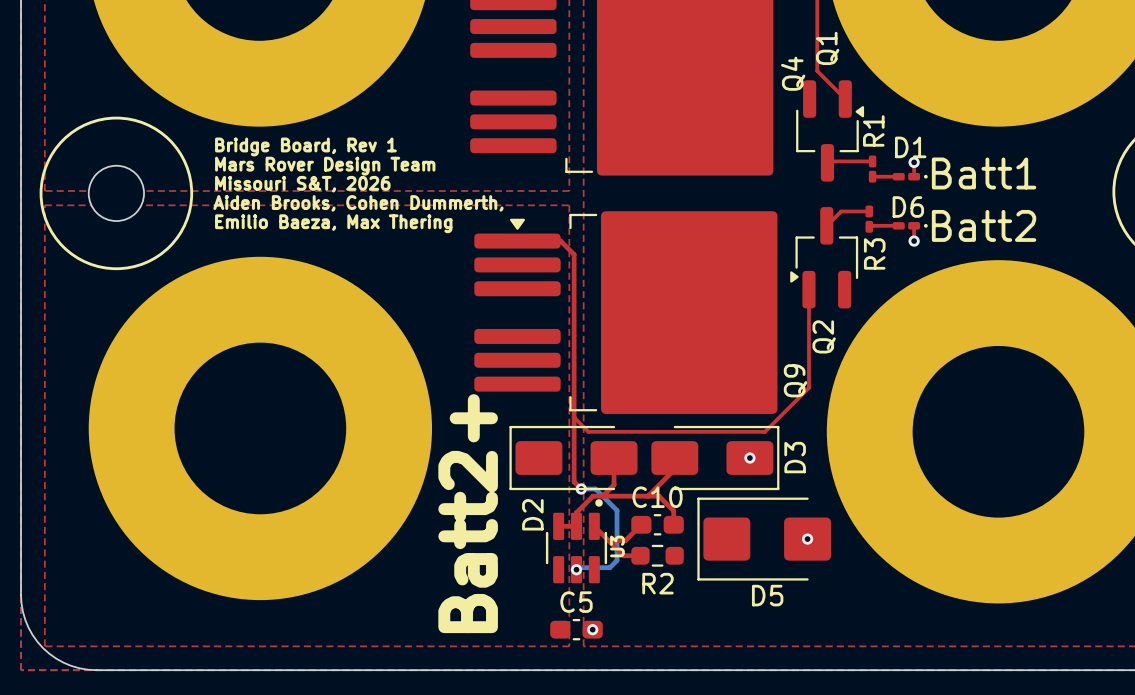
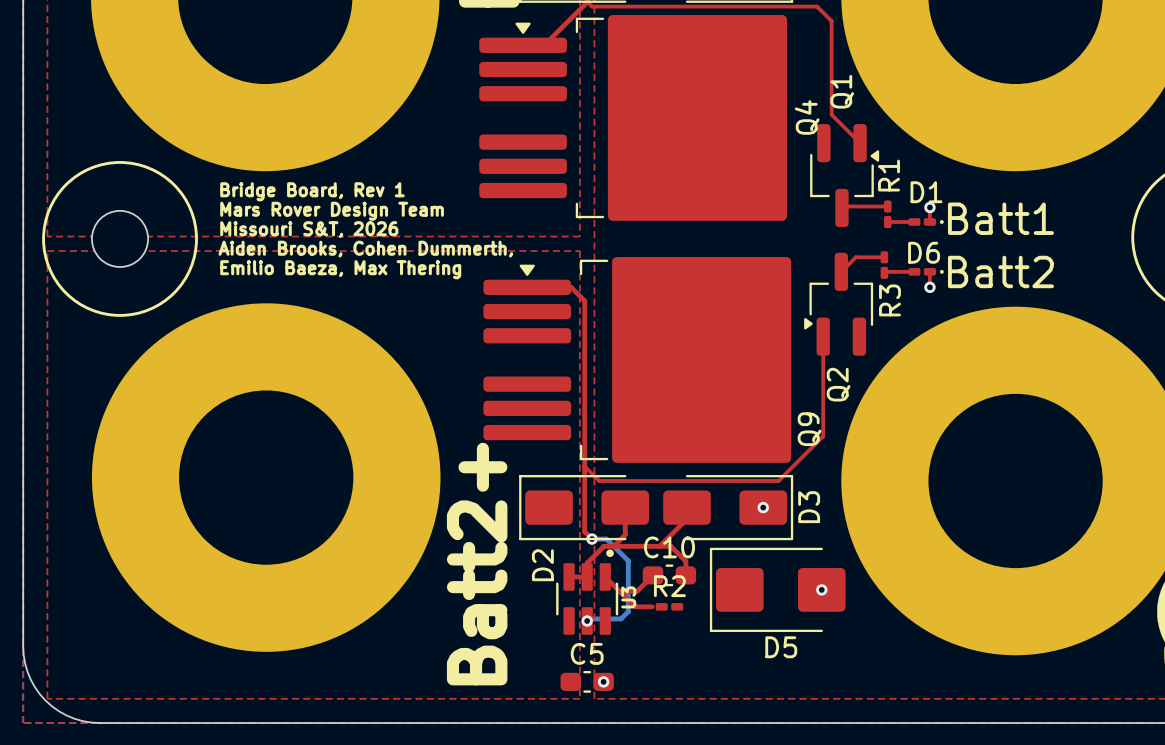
R2 footprint: [631, 544, 684, 567] -> [655, 603, 684, 611]
R2 name position: R2 (657, 583) -> R2 (669, 586)

